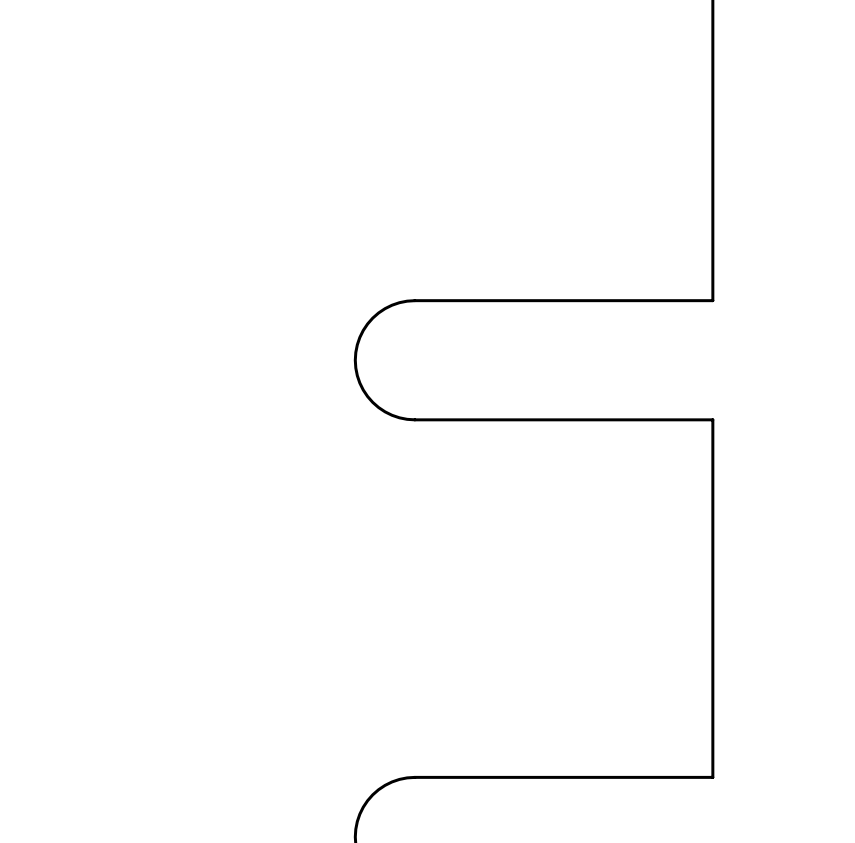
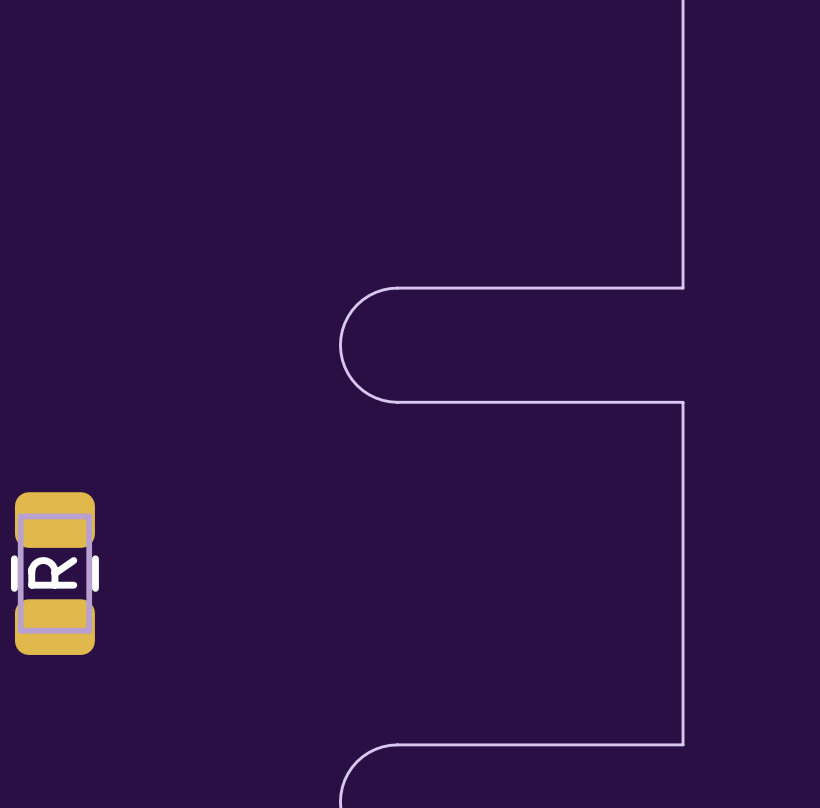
part: none -> (54, 573)

